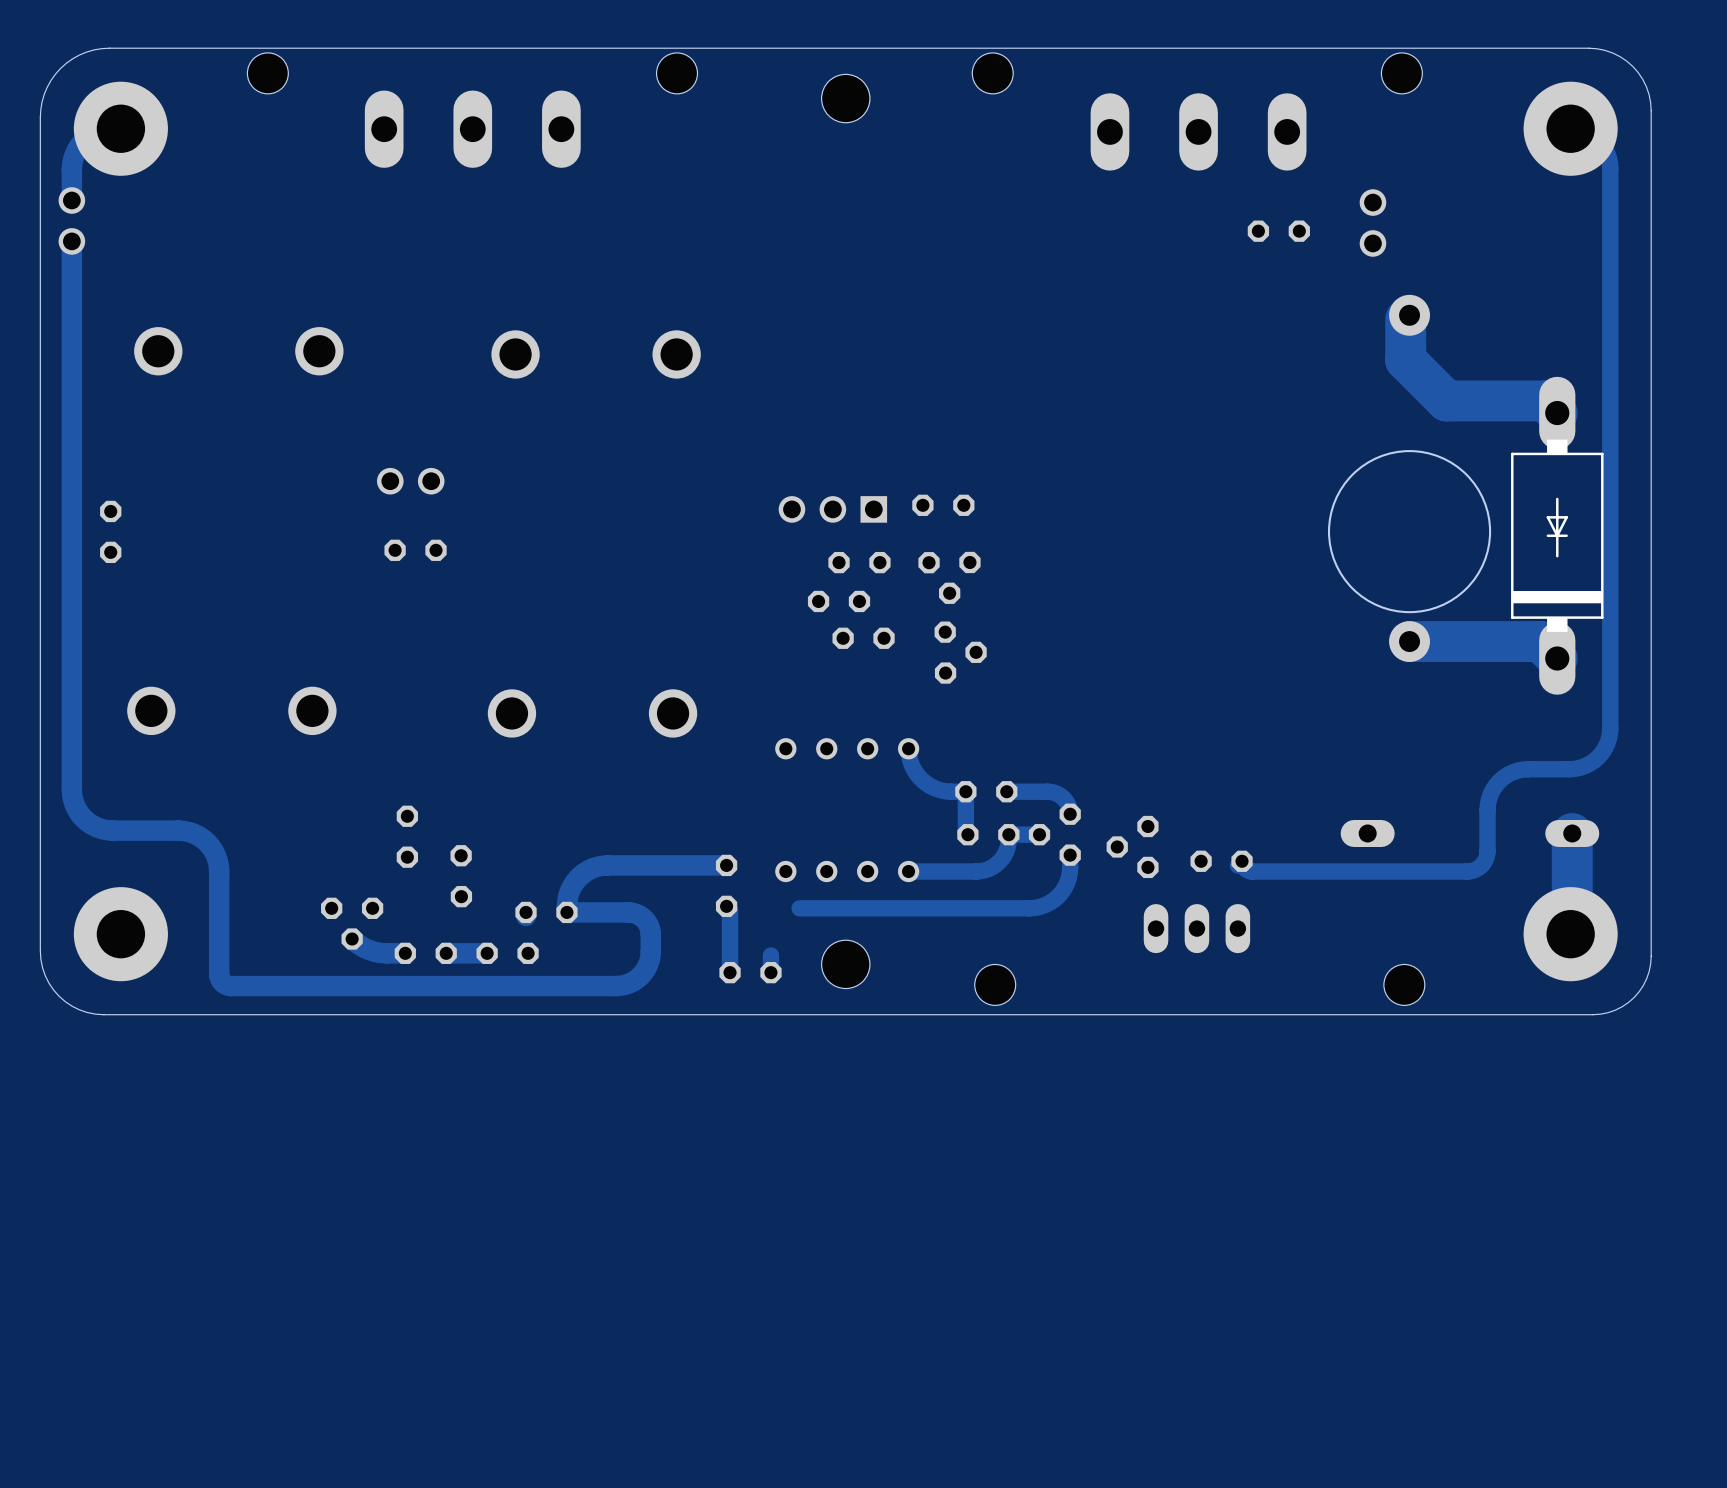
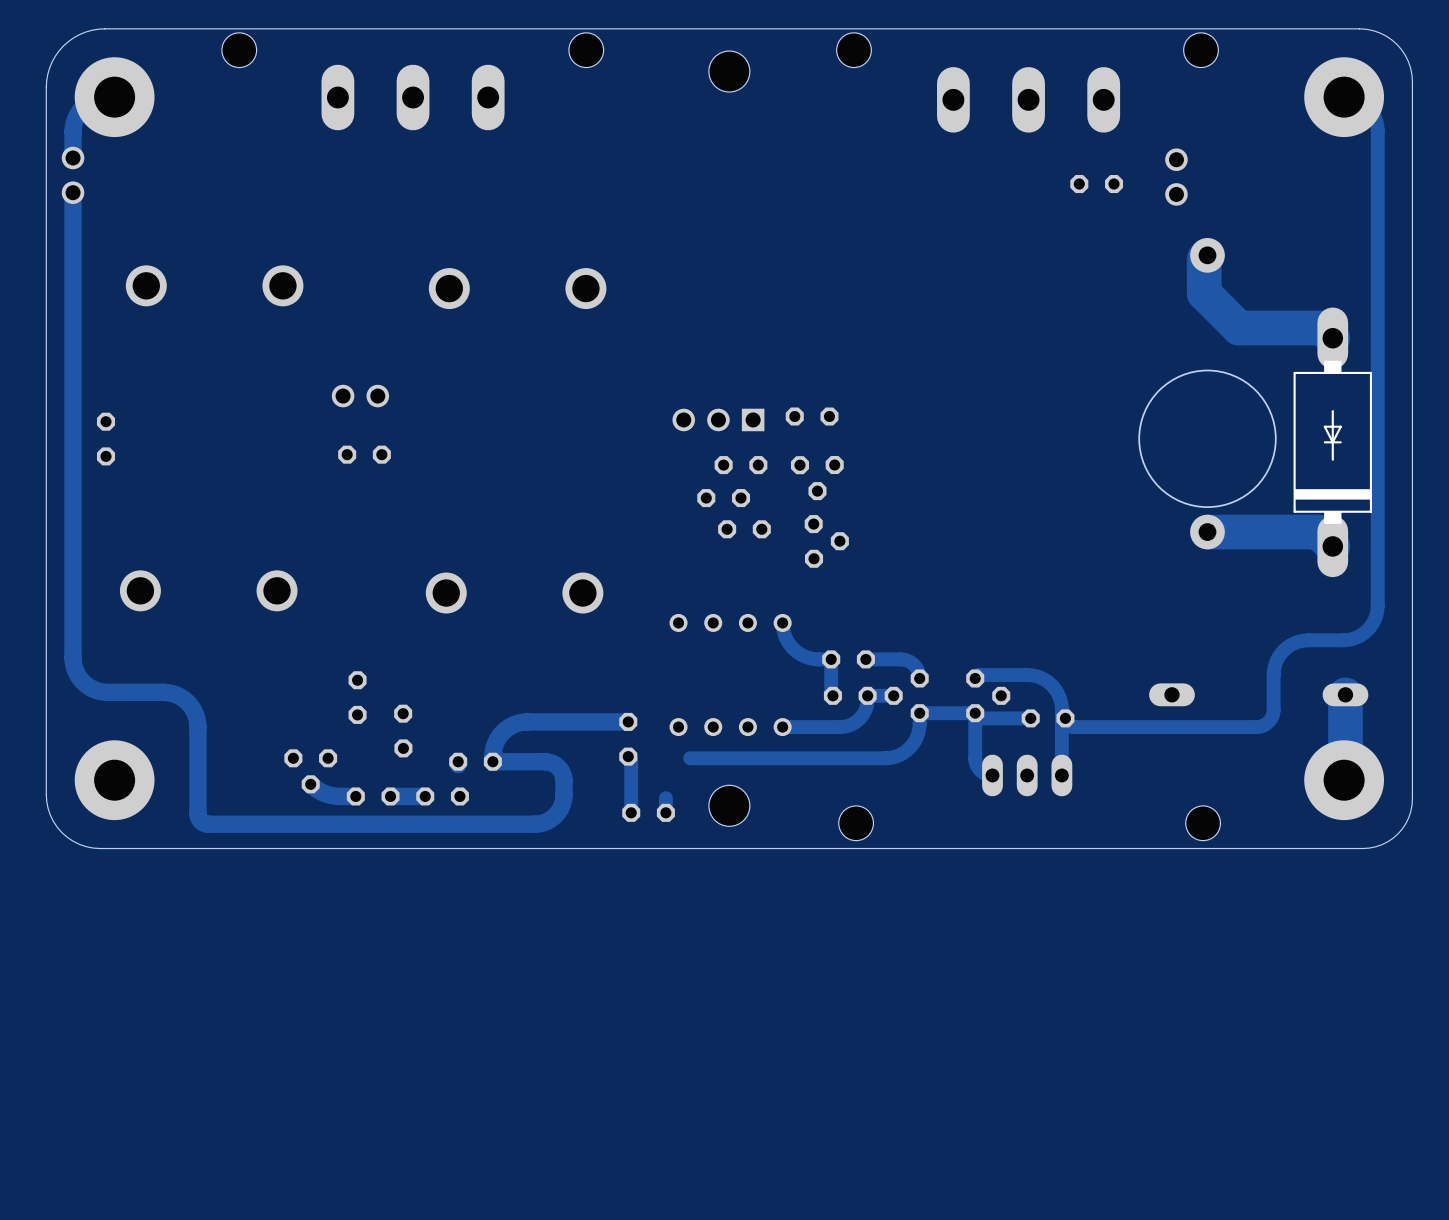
track: none -> (975, 678) (978, 675) (1031, 675) (1044, 679) (1051, 685) (1057, 692) (1061, 705) (1061, 775)
part rotation: 0° (1132, 846) -> 180° (988, 695)
track: none -> (975, 713) (975, 762) (981, 771) (992, 775) (990, 773)
track: none -> (975, 713) (919, 713)
track: none -> (975, 713) (979, 718) (1030, 718)

